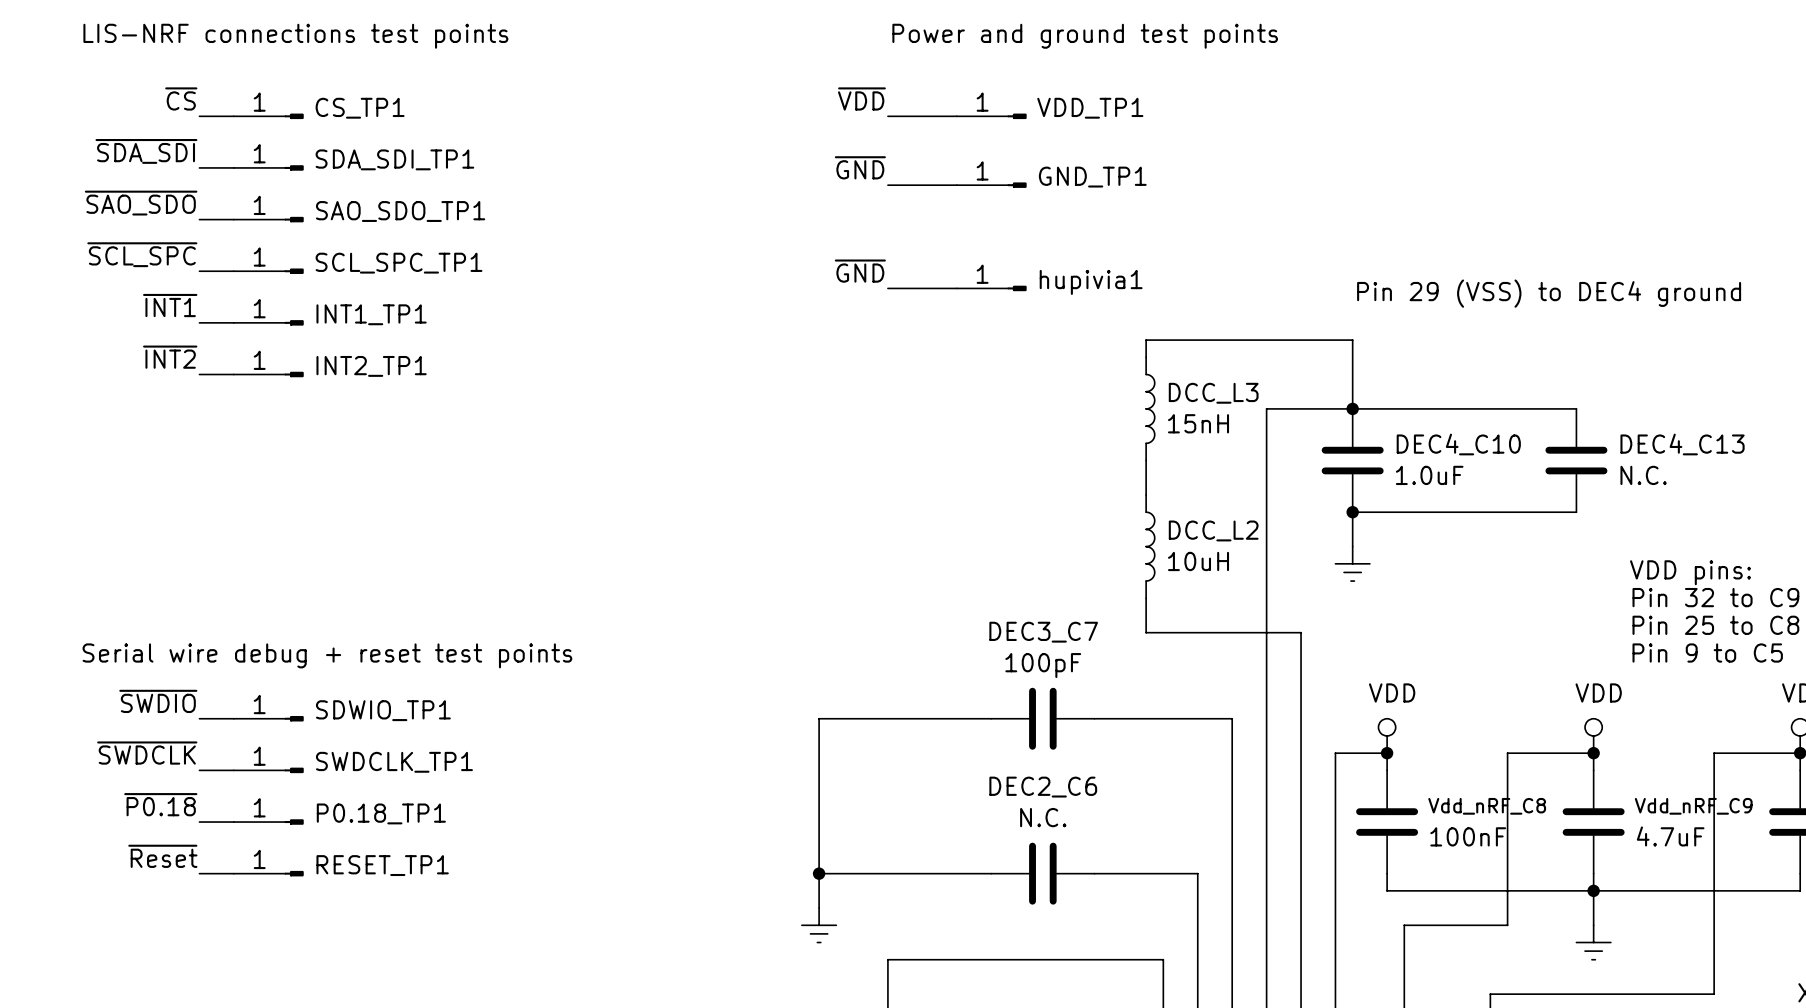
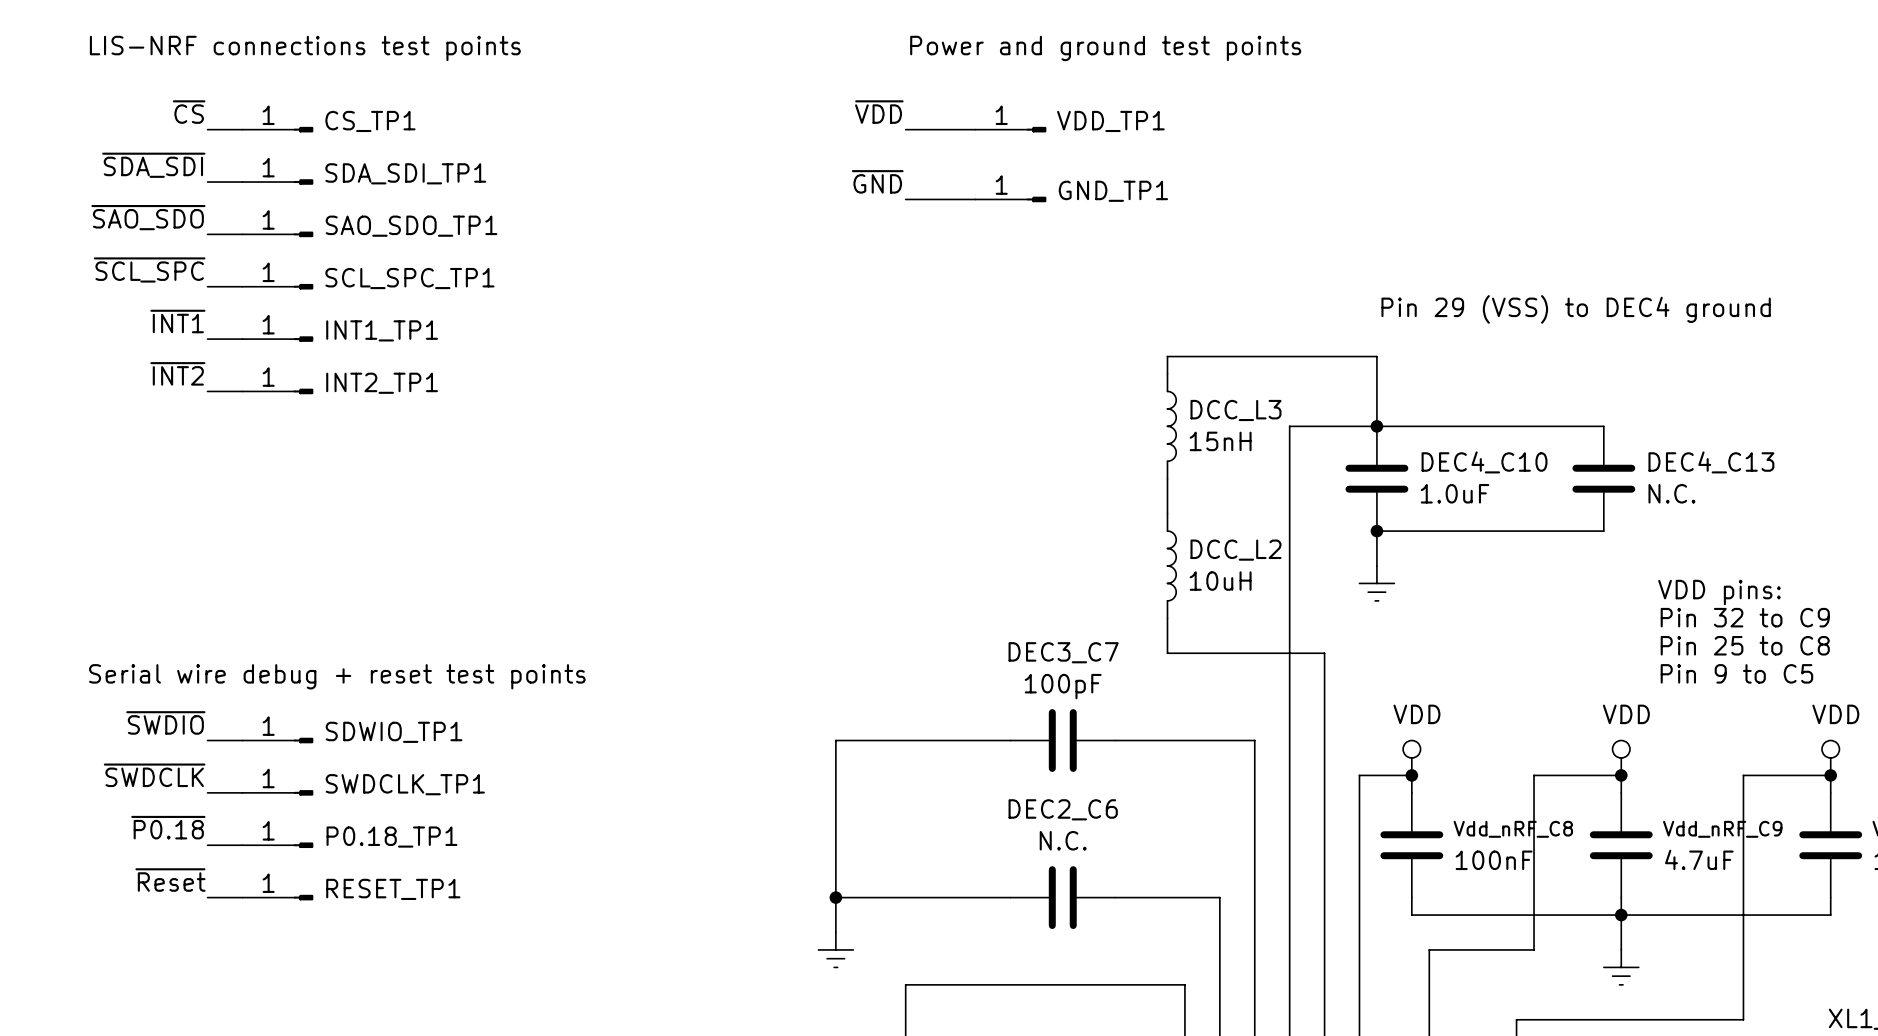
label: ~{GND} (860, 271) -> none
wire: (887, 288) (956, 288) -> none
hupivia1: (991, 288) -> none

